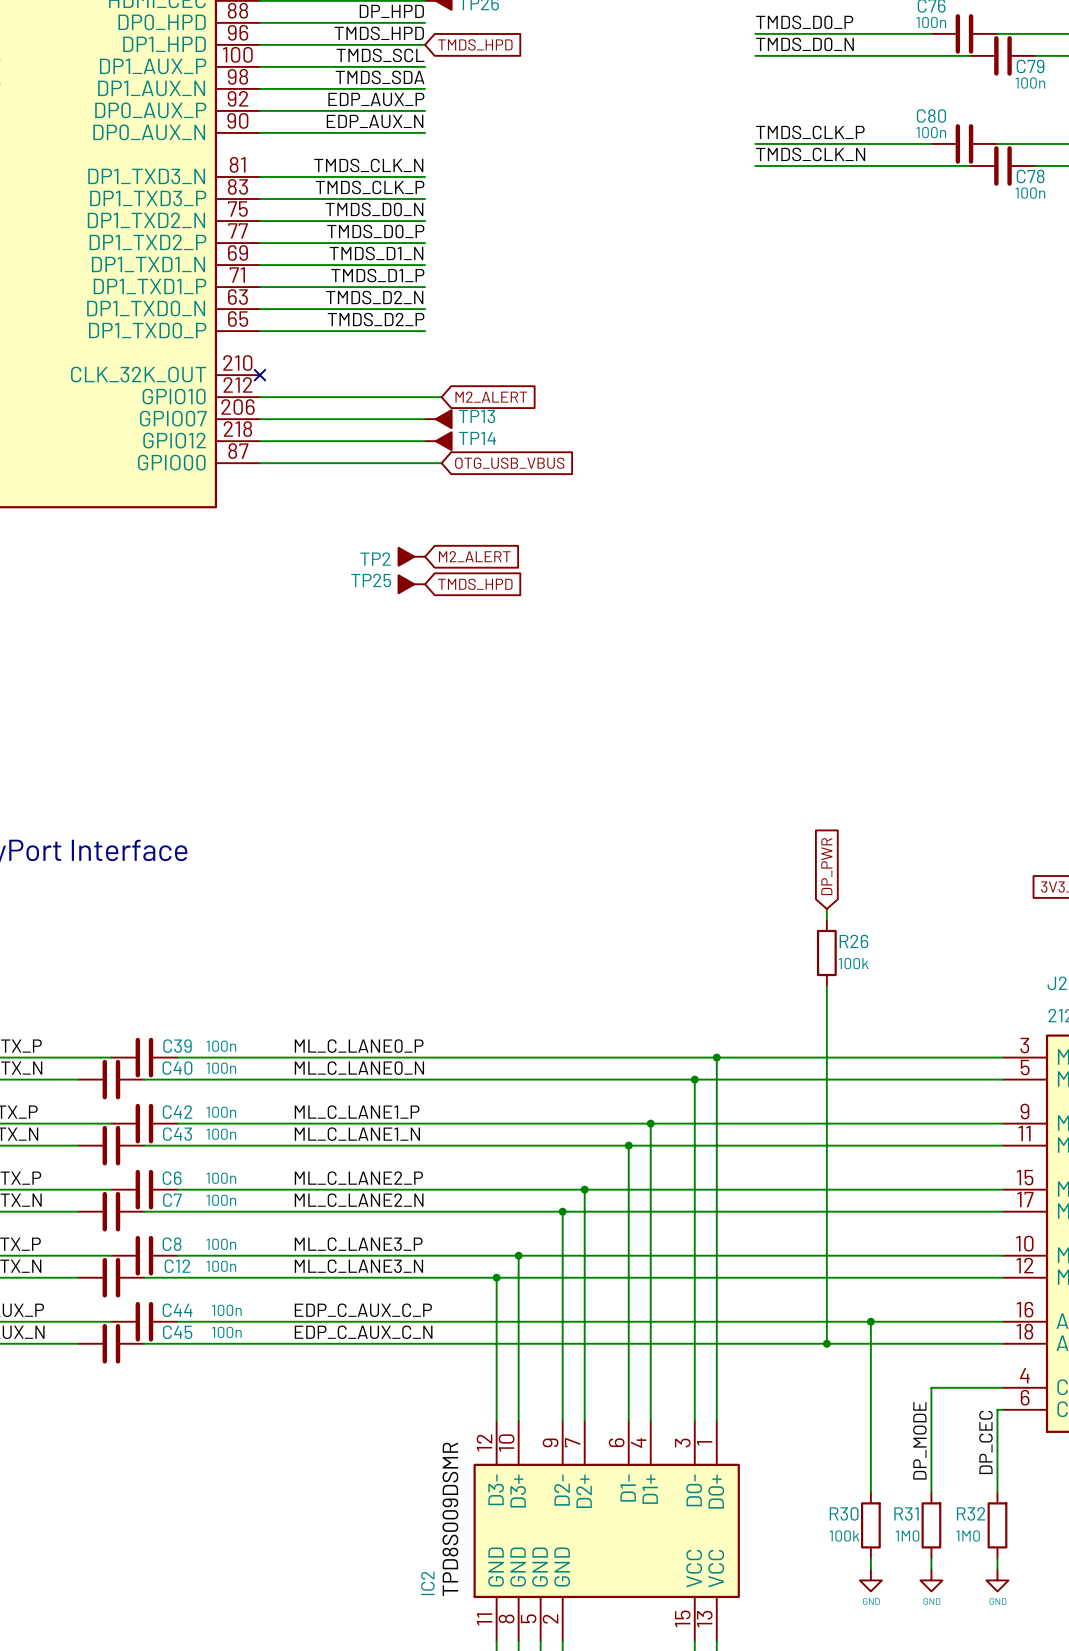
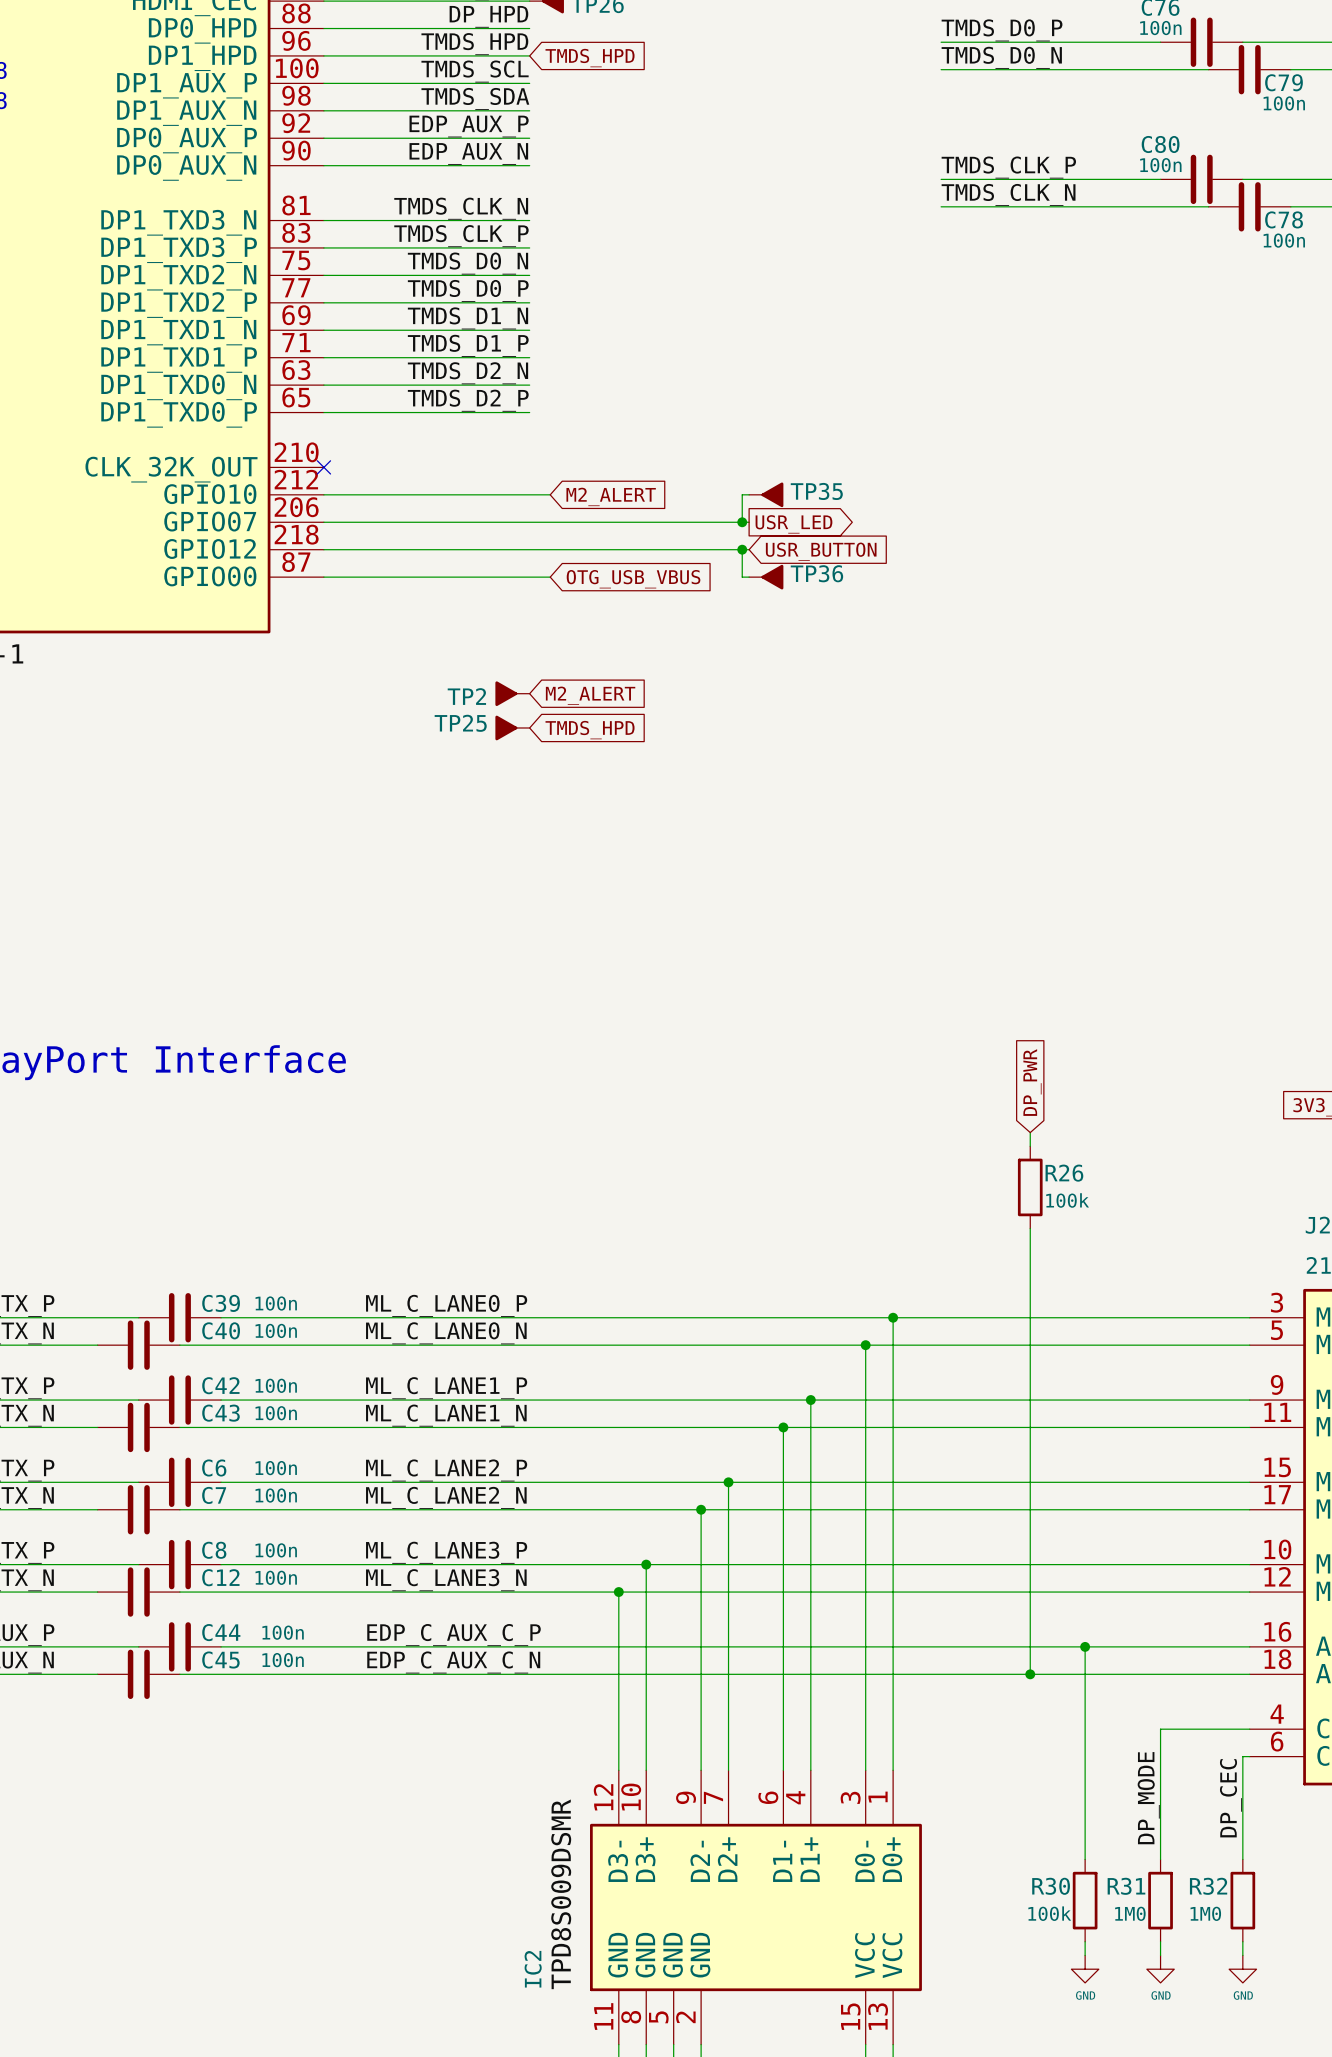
wire: none -> (749, 494) (742, 494) (742, 522)
TP35: none -> (766, 494)
wire: none -> (529, 522) (749, 522)
TP13: (438, 419) -> none
junction: none -> (742, 522)
global label: none -> USR_LED (793, 524)
wire: none -> (529, 549) (749, 549)
TP14: (438, 441) -> none
wire: none -> (742, 549) (742, 577) (749, 577)
junction: none -> (742, 549)
global label: none -> USR_BUTTON (821, 551)
TP36: none -> (766, 577)

